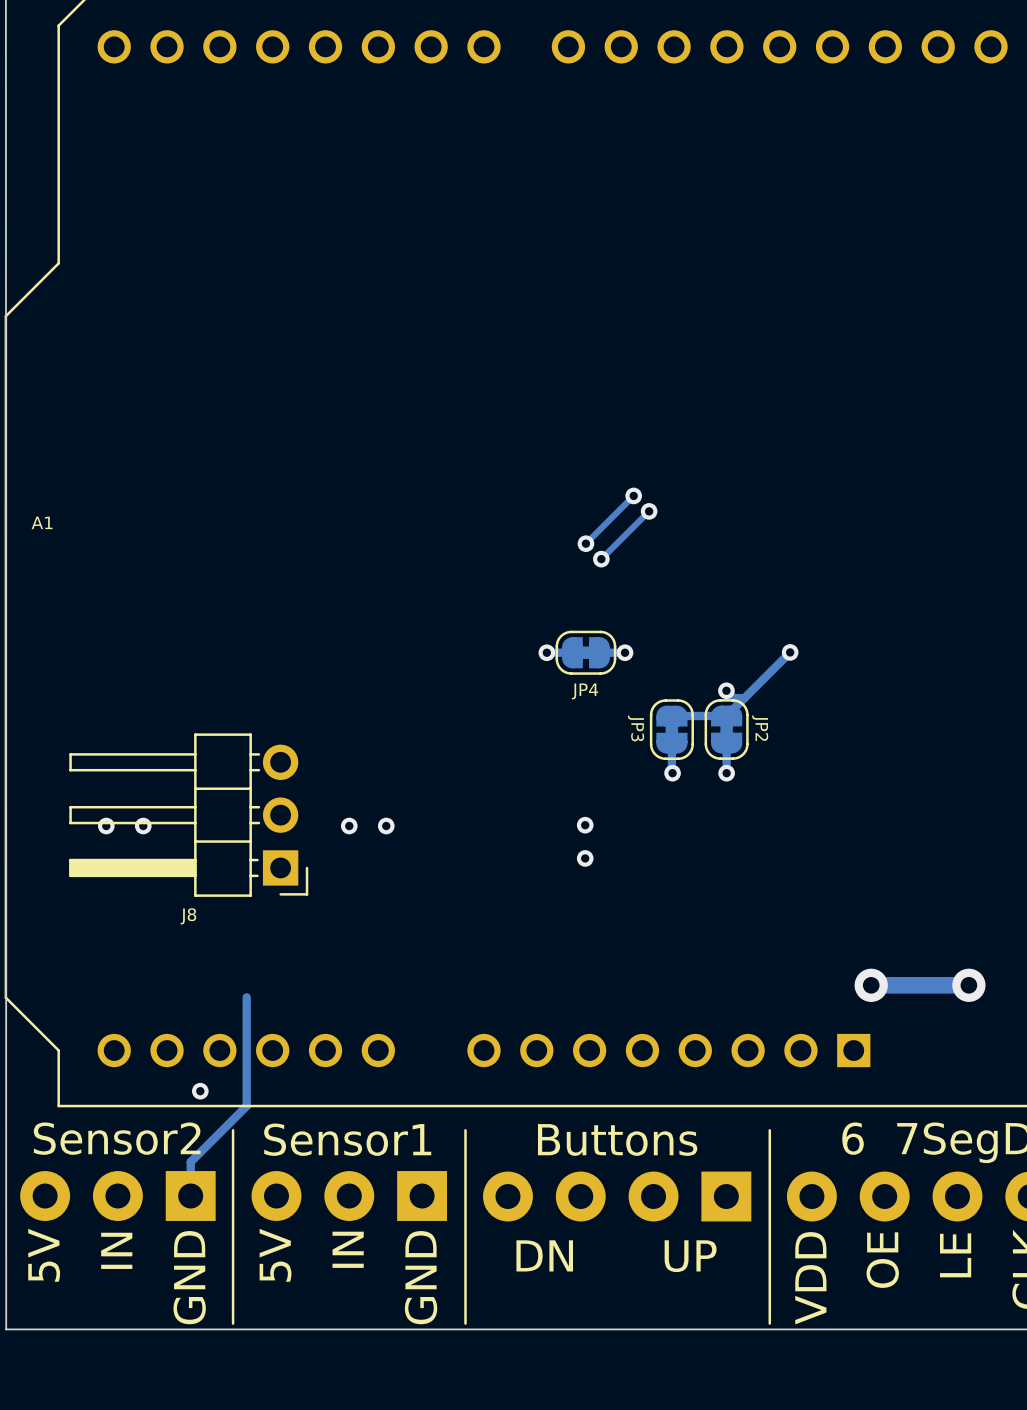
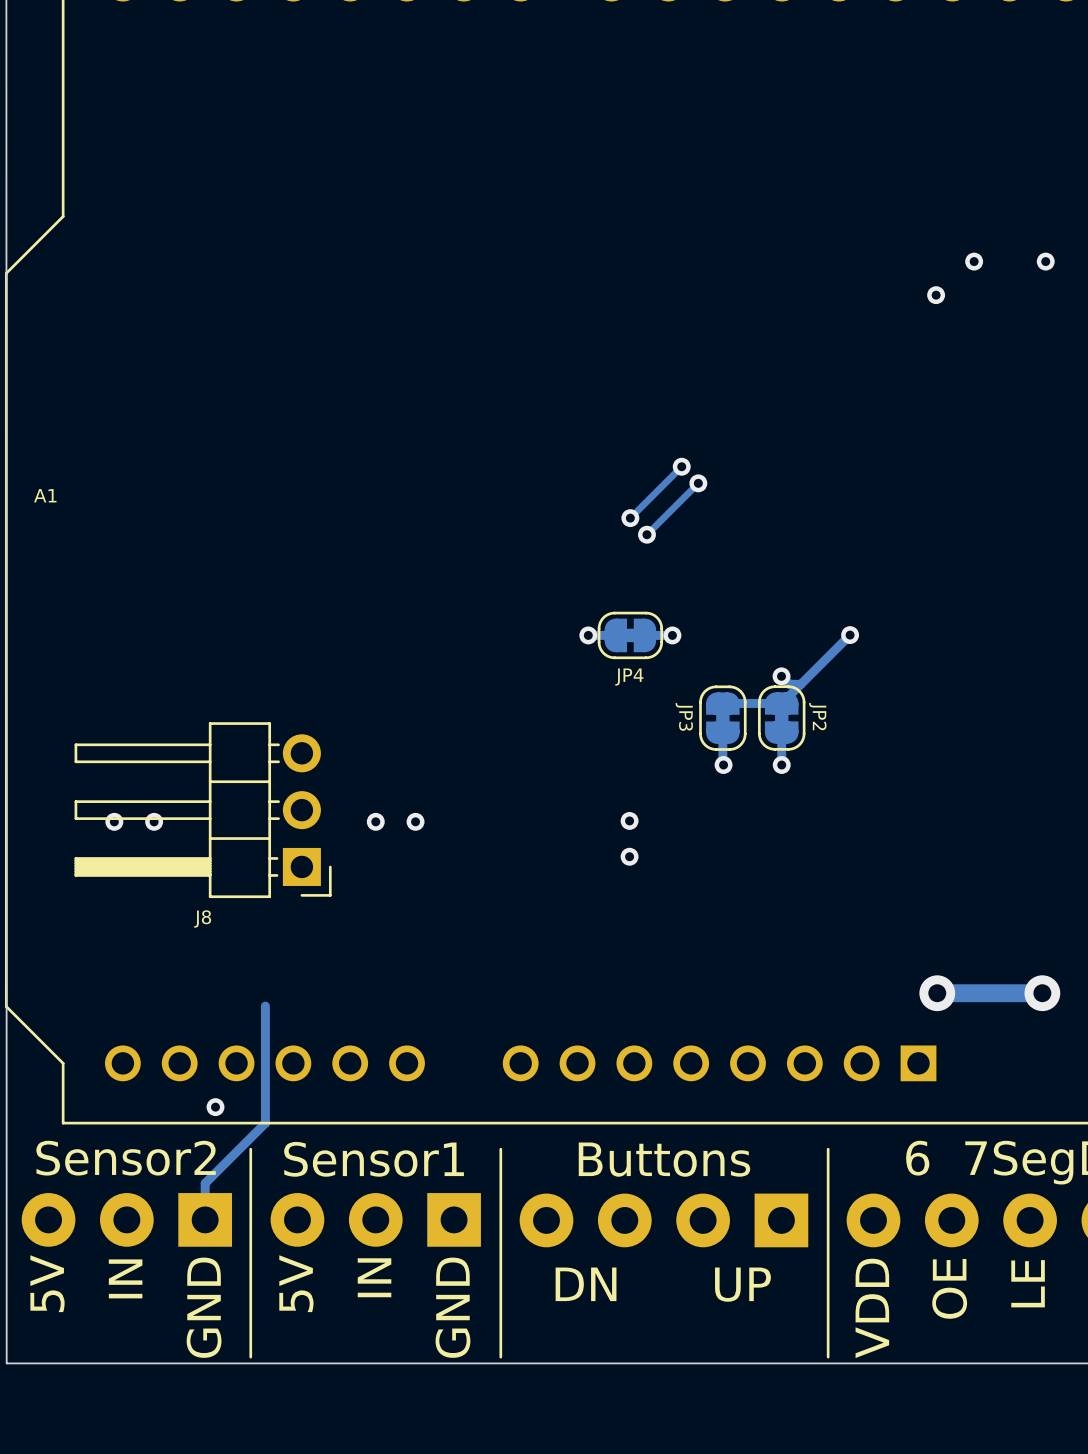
via: none -> (974, 261)
via: none -> (1045, 261)
via: none -> (936, 295)

